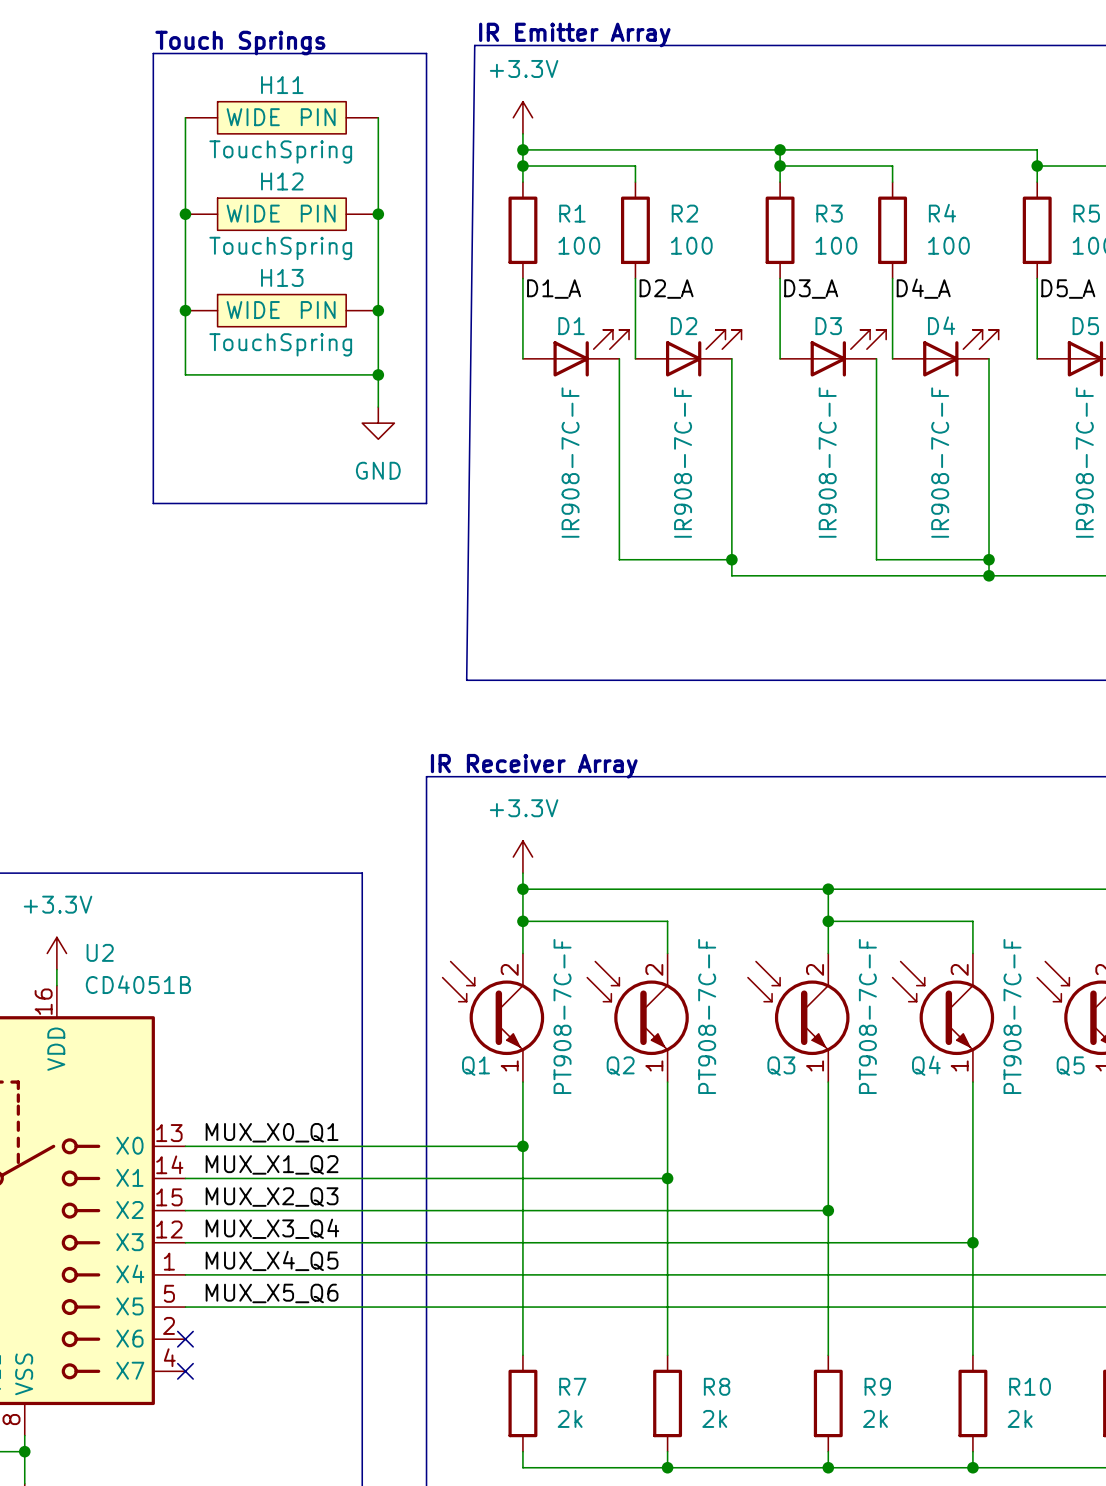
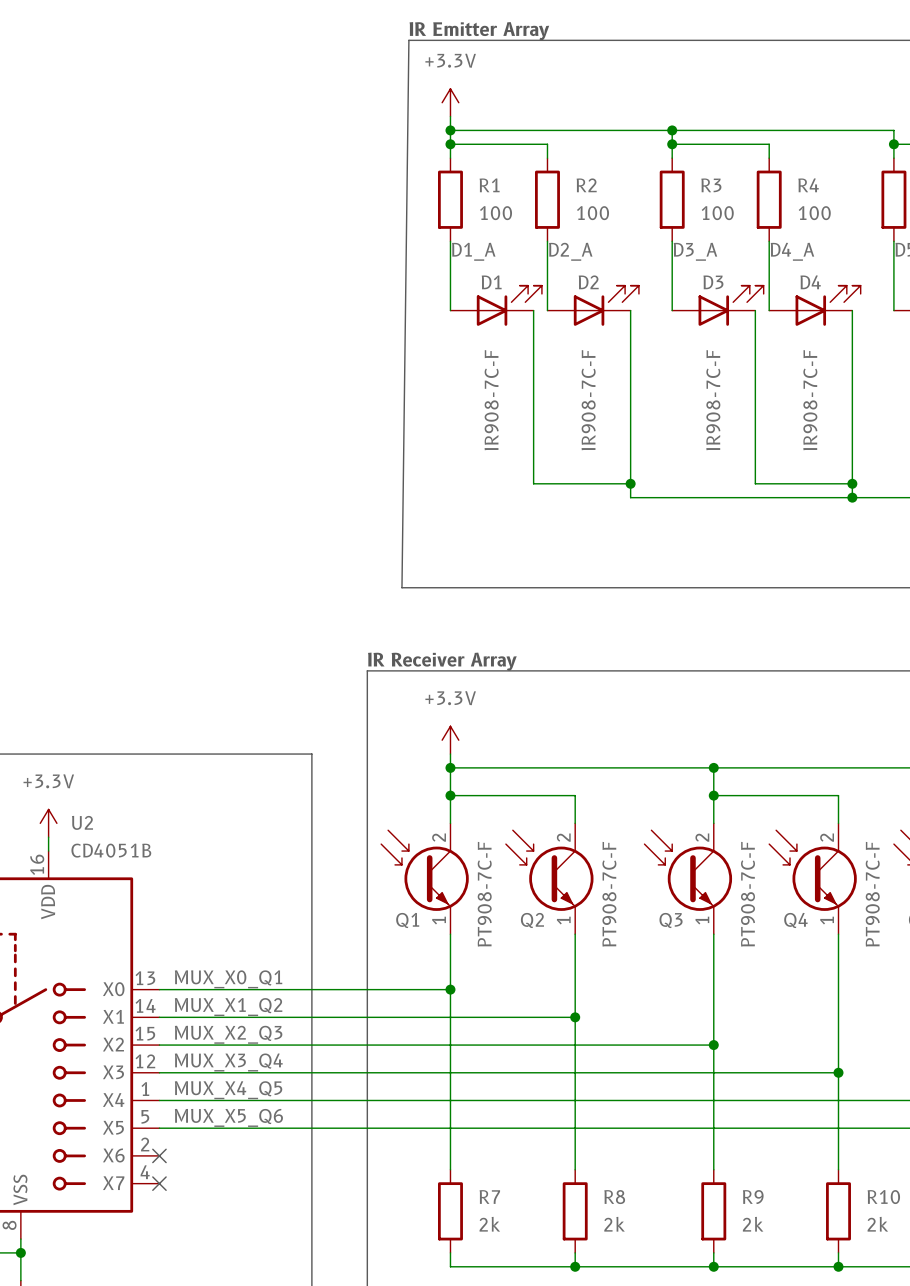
text: Touch Springs (240, 43) -> none
line: (153, 53) (153, 503) (426, 503) (426, 53) (153, 53) -> none
wire: (185, 117) (185, 374) (378, 374) -> none
H11: TouchSpring (281, 117) -> none
wire: (378, 117) (378, 407) -> none
junction: (185, 214) -> none
H12: TouchSpring (281, 214) -> none
junction: (378, 214) -> none
junction: (185, 310) -> none
H13: TouchSpring (281, 310) -> none
junction: (378, 310) -> none
junction: (378, 374) -> none
power symbol: GND (378, 423) -> none

